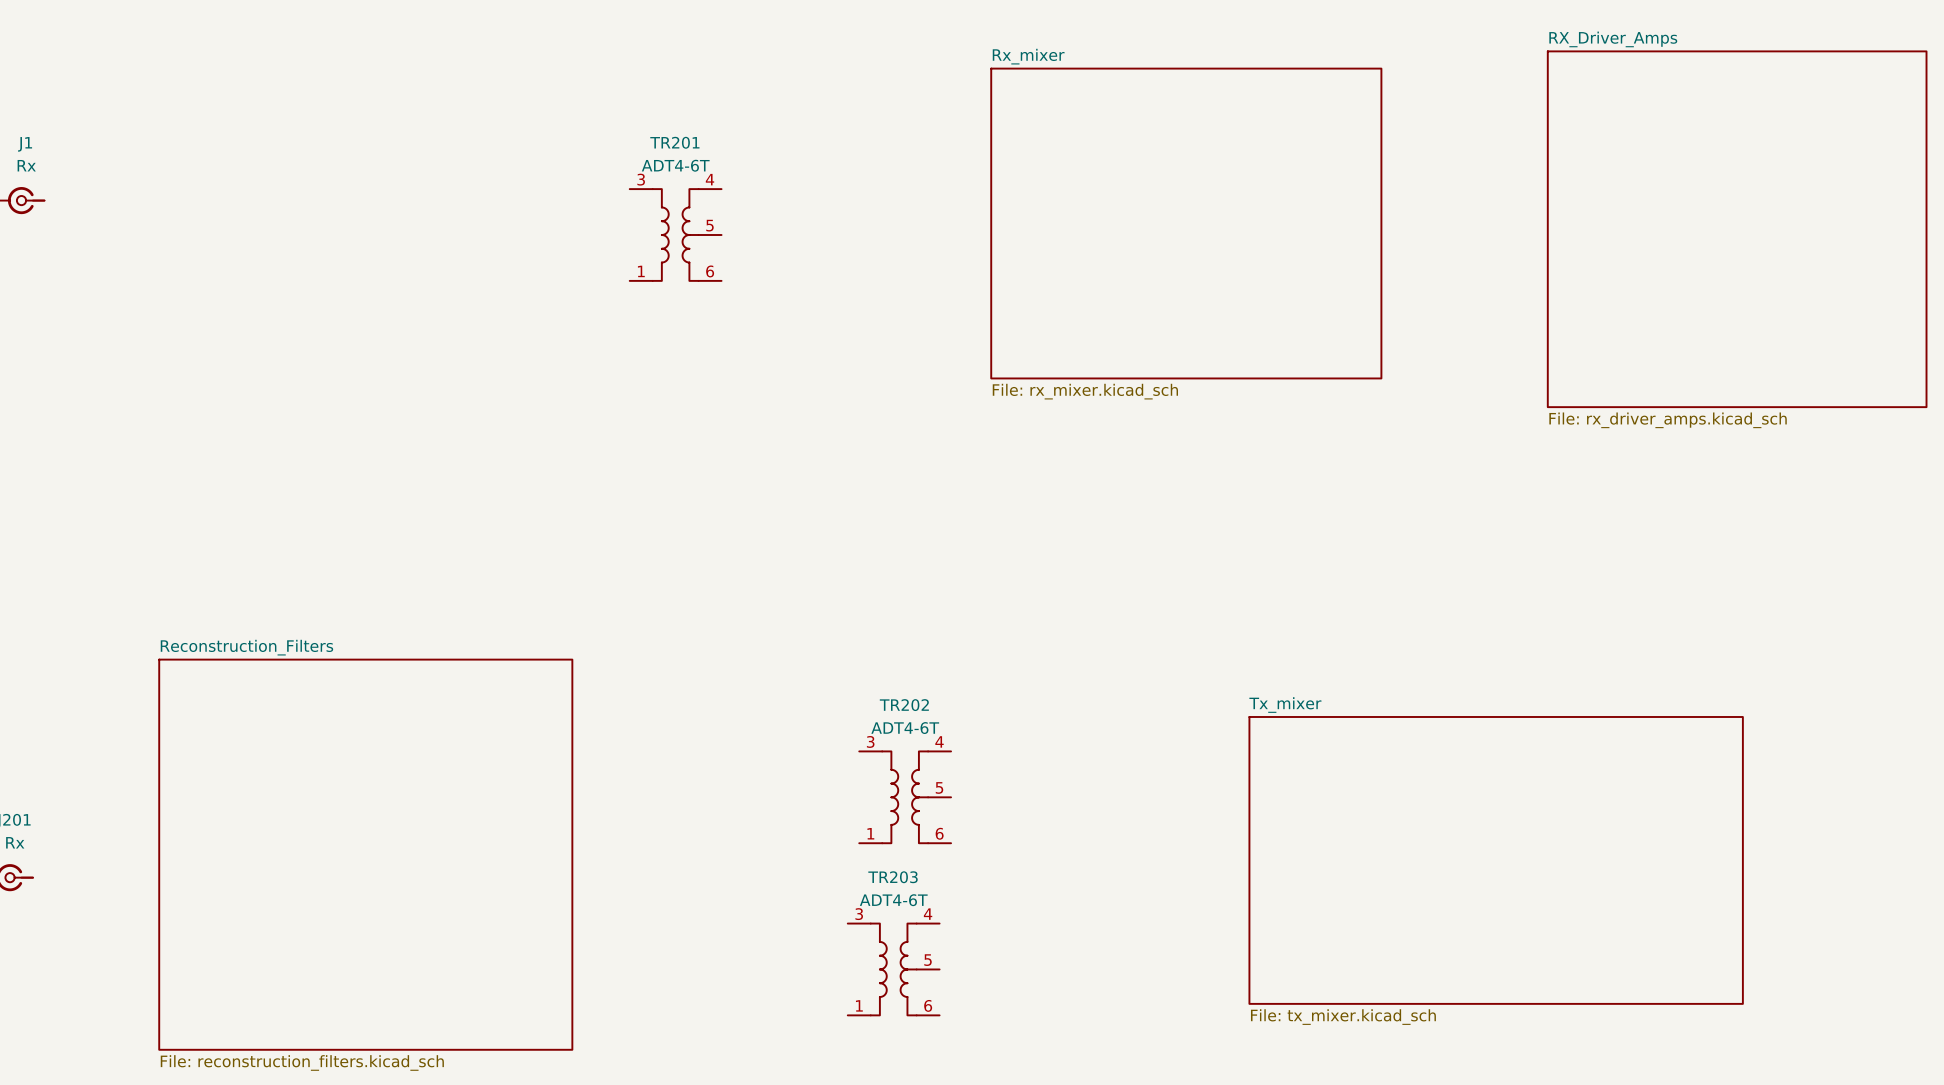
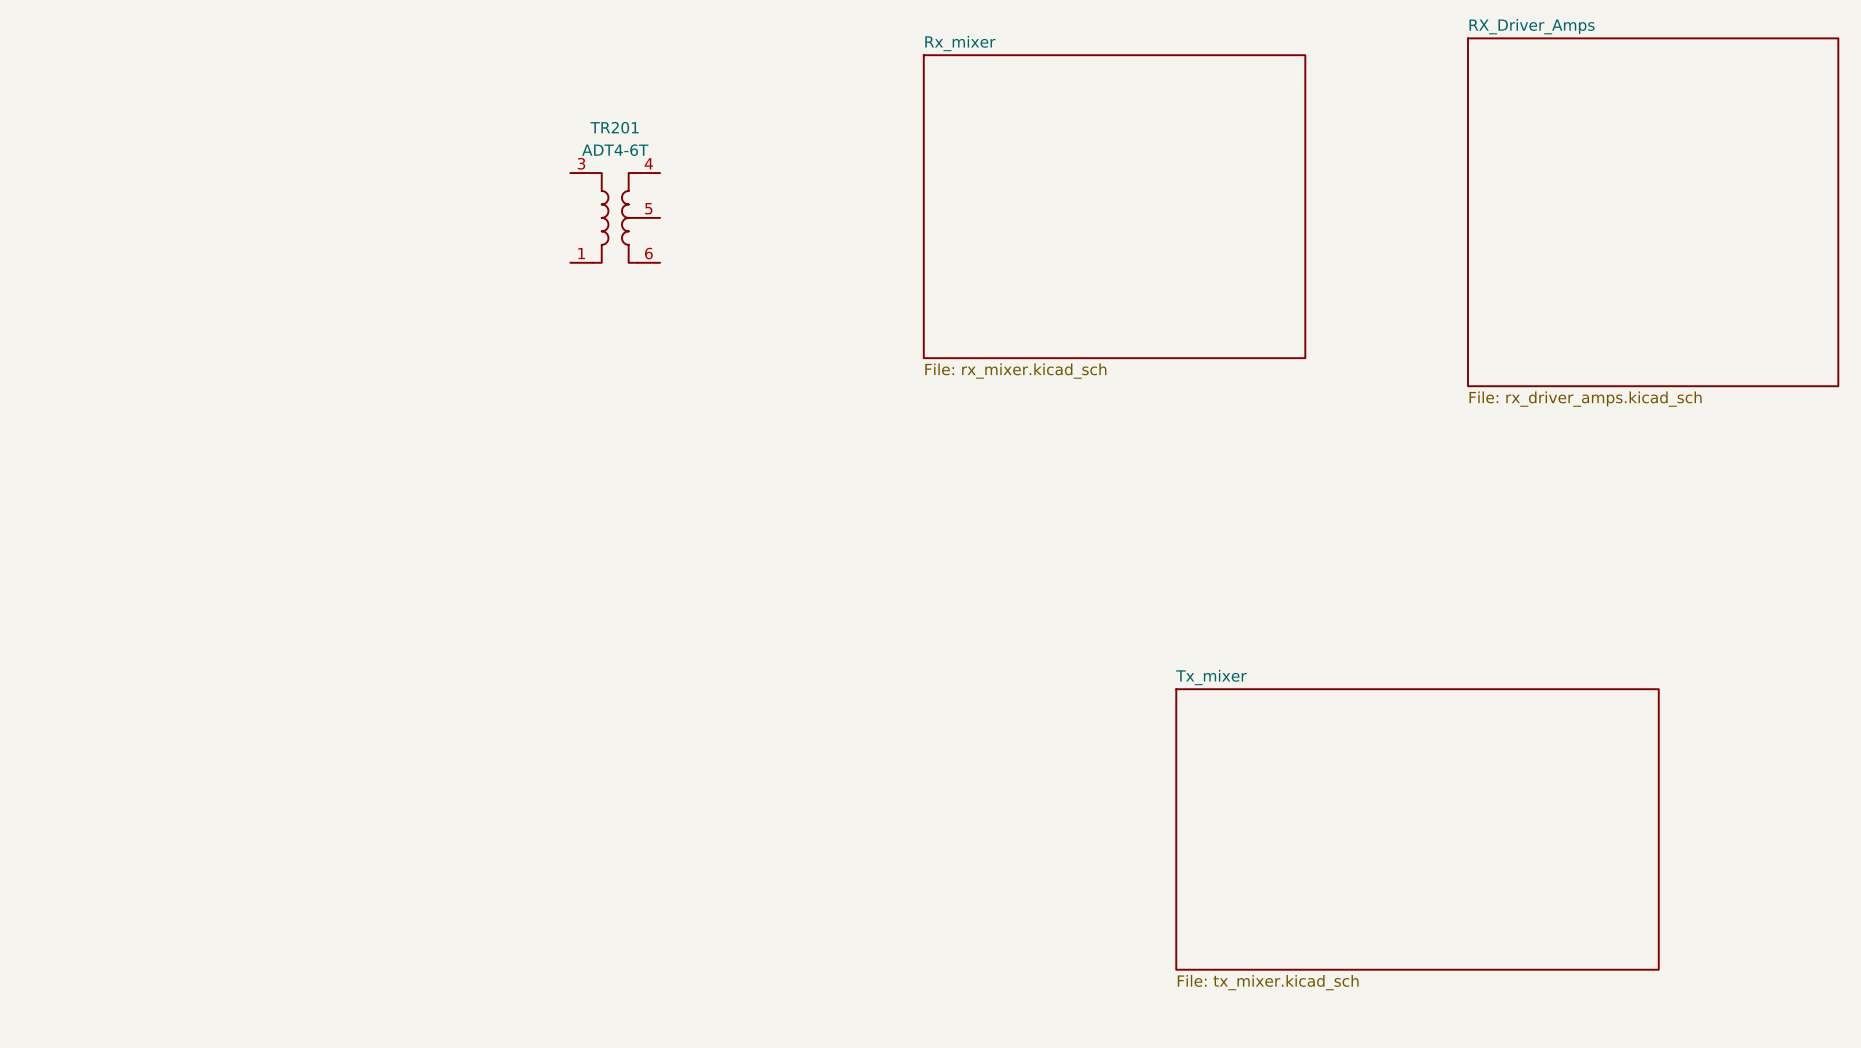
TR202: ADT4-6T (905, 797) -> none
sheet Reconstruction_Filters: File: reconstruction_filters.kicad_sch (365, 854) -> none
TR203: ADT4-6T (893, 969) -> none

